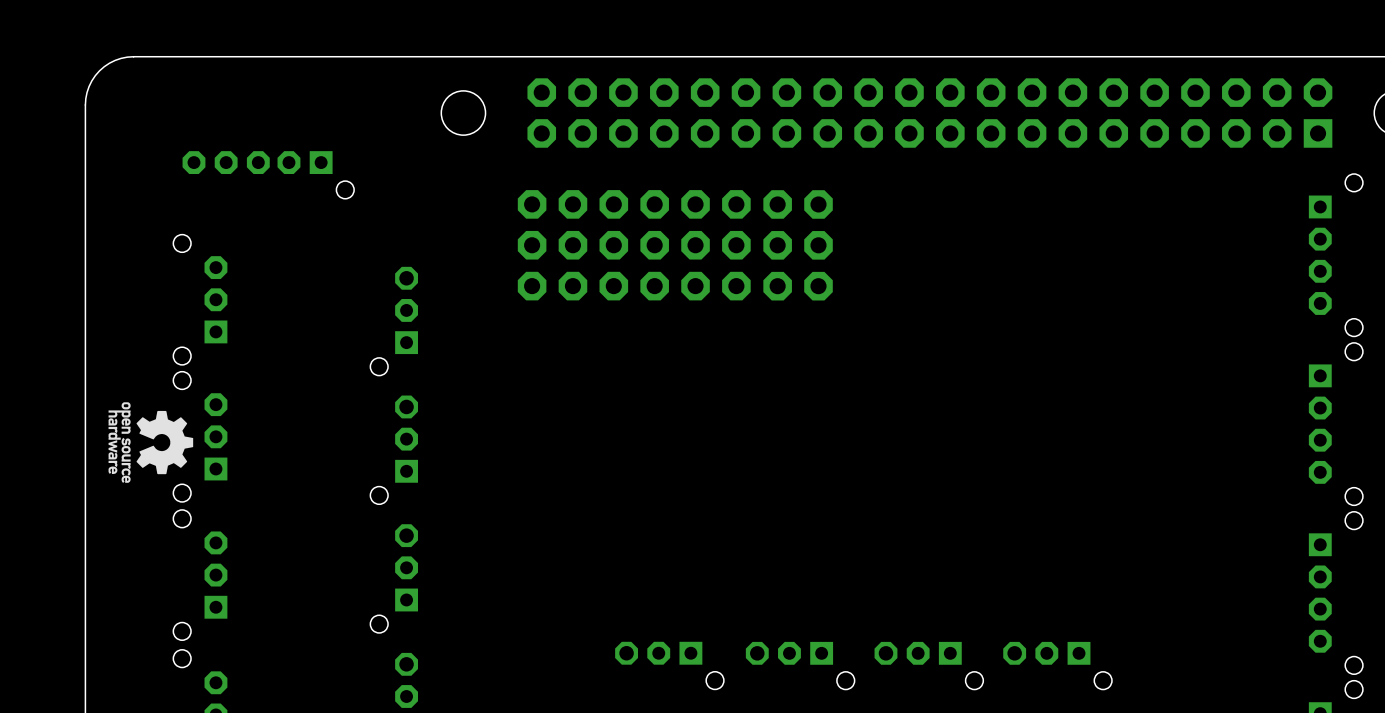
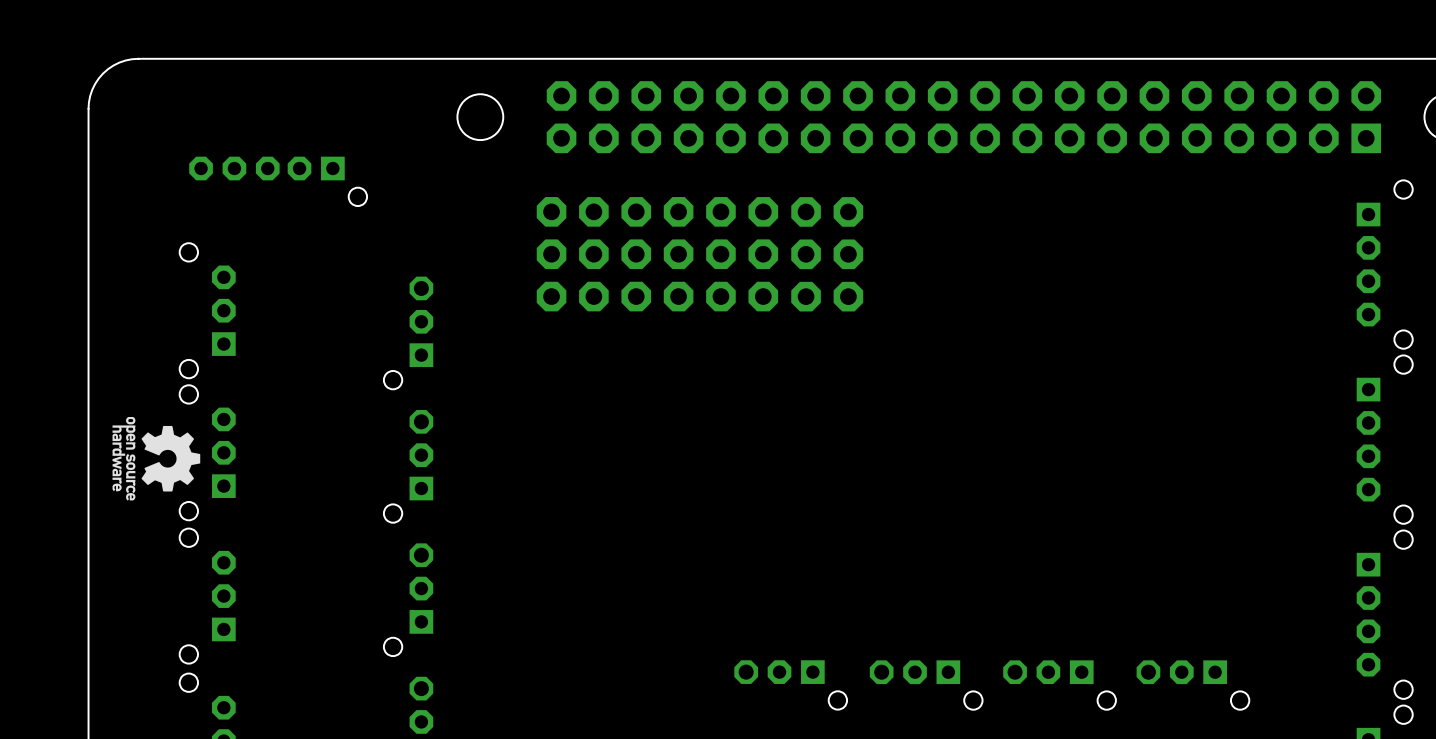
part: none -> (1192, 685)
part: (669, 665) -> none
part position: (800, 665) -> (790, 684)
part position: (928, 665) -> (926, 685)
part position: (1057, 665) -> (1059, 685)

